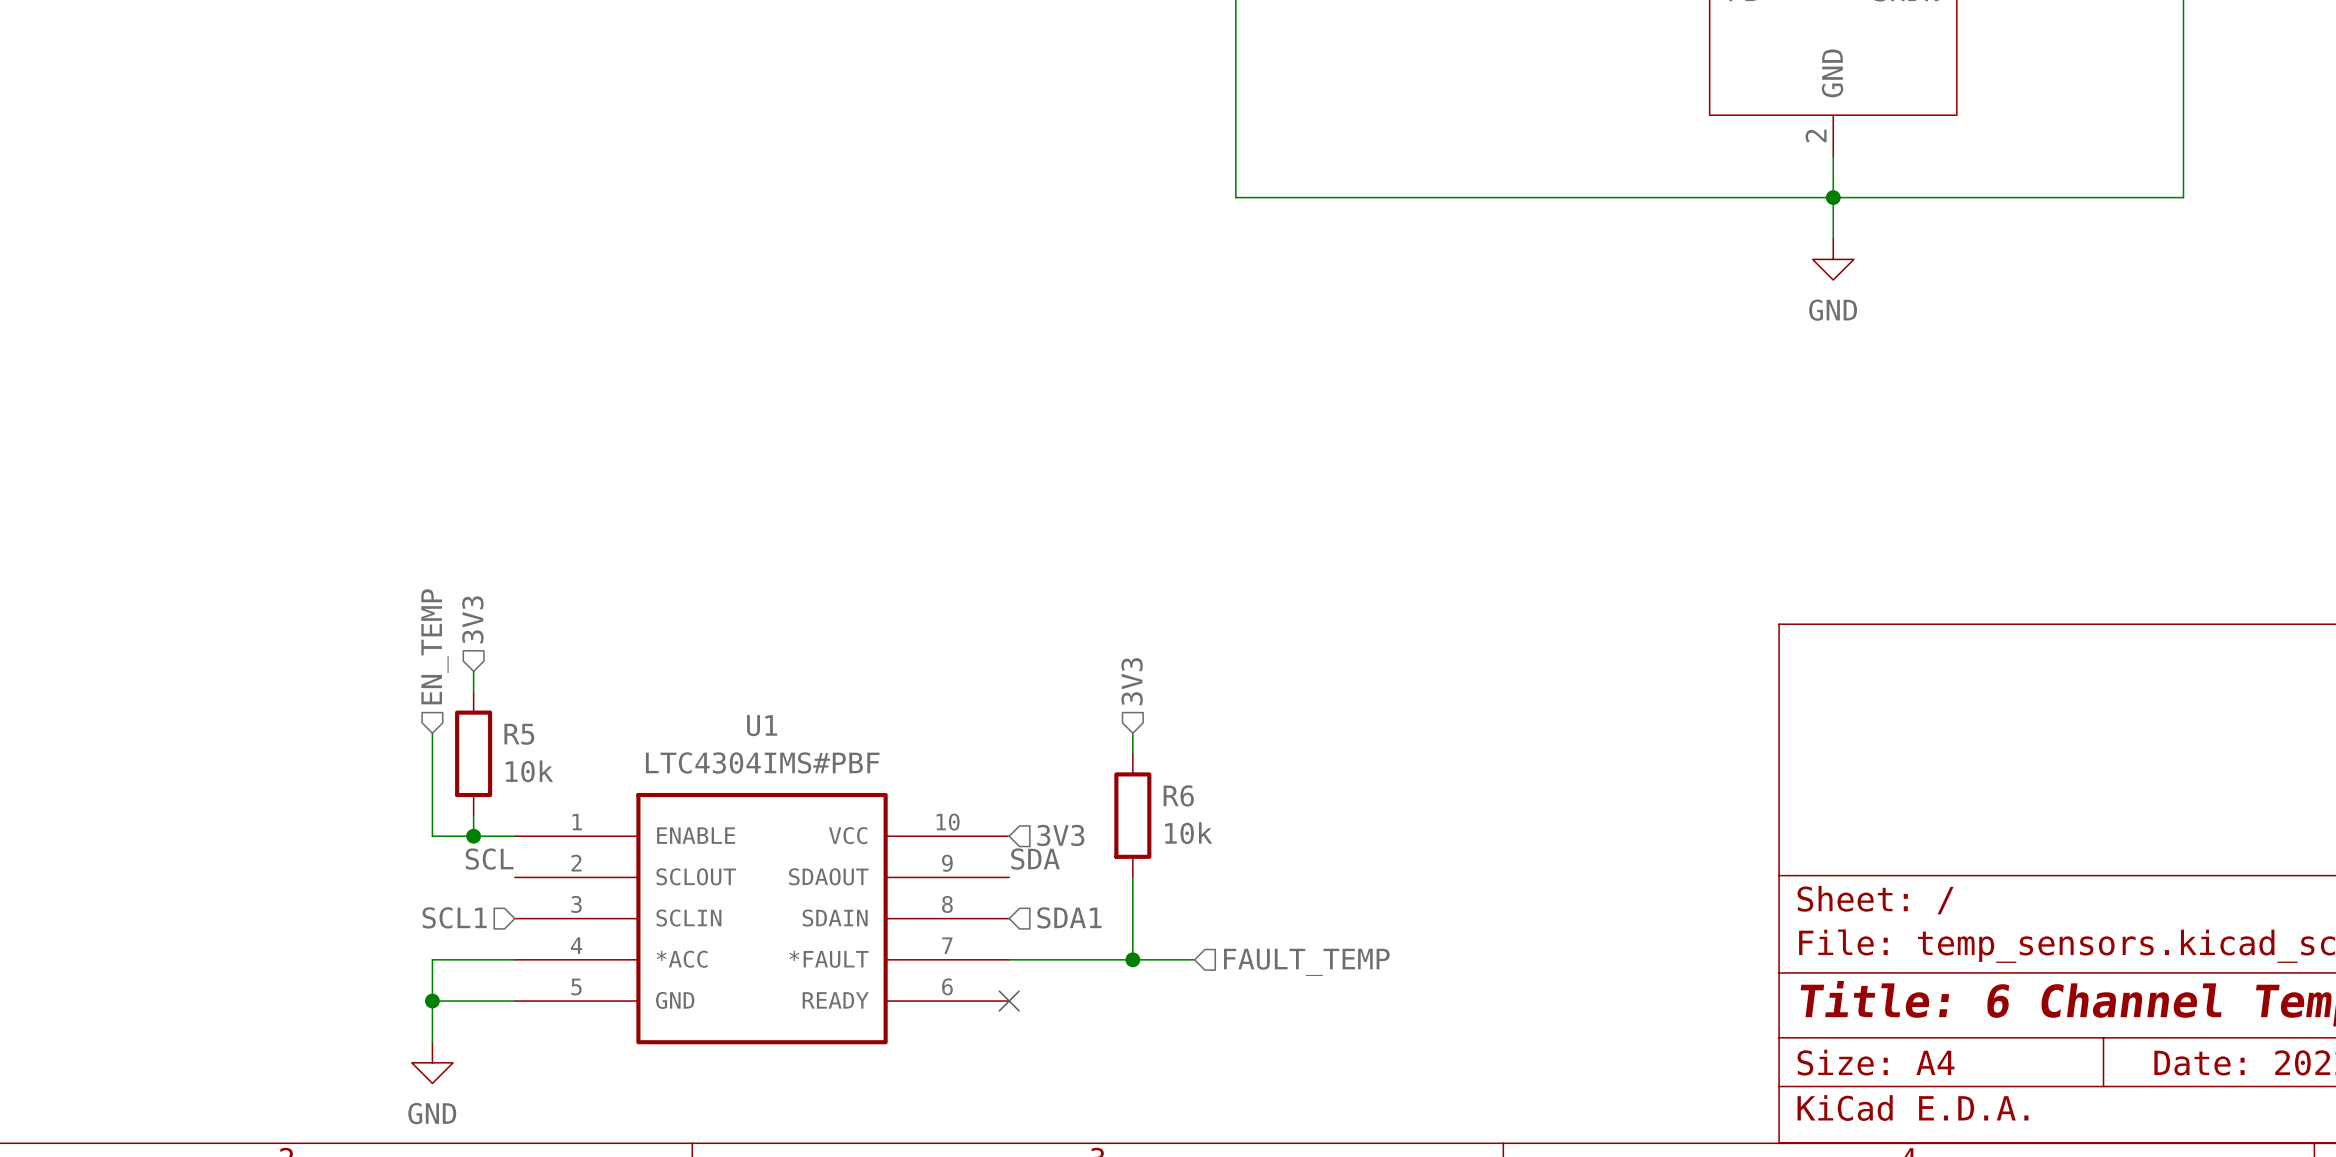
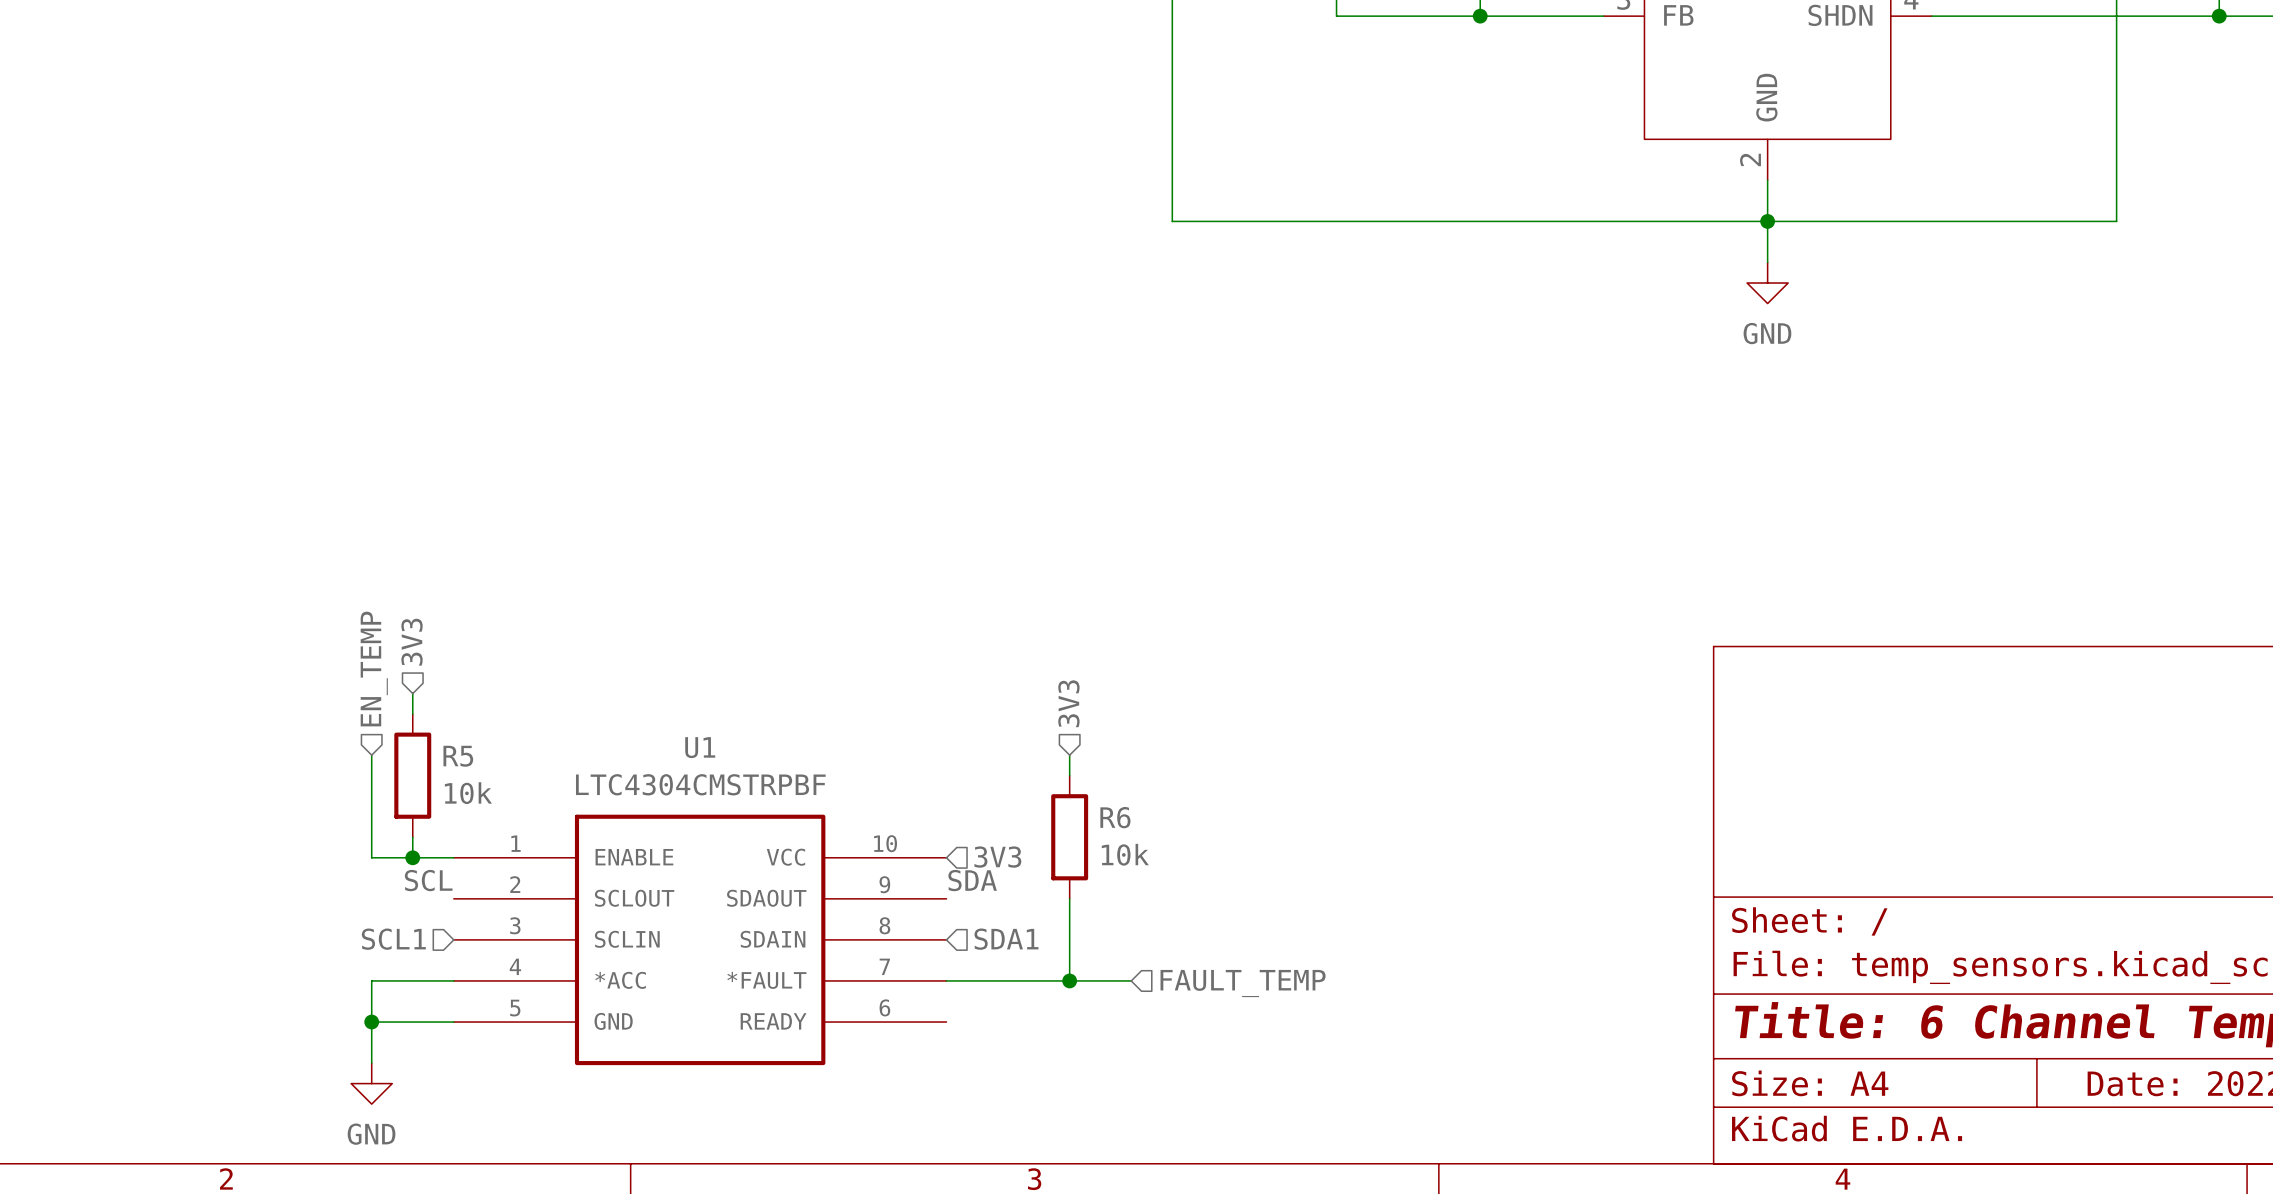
U1 value: LTC4304IMS#PBF (762, 762) -> LTC4304CMSTRPBF (700, 784)
no-connect mark: (1009, 1001) -> none

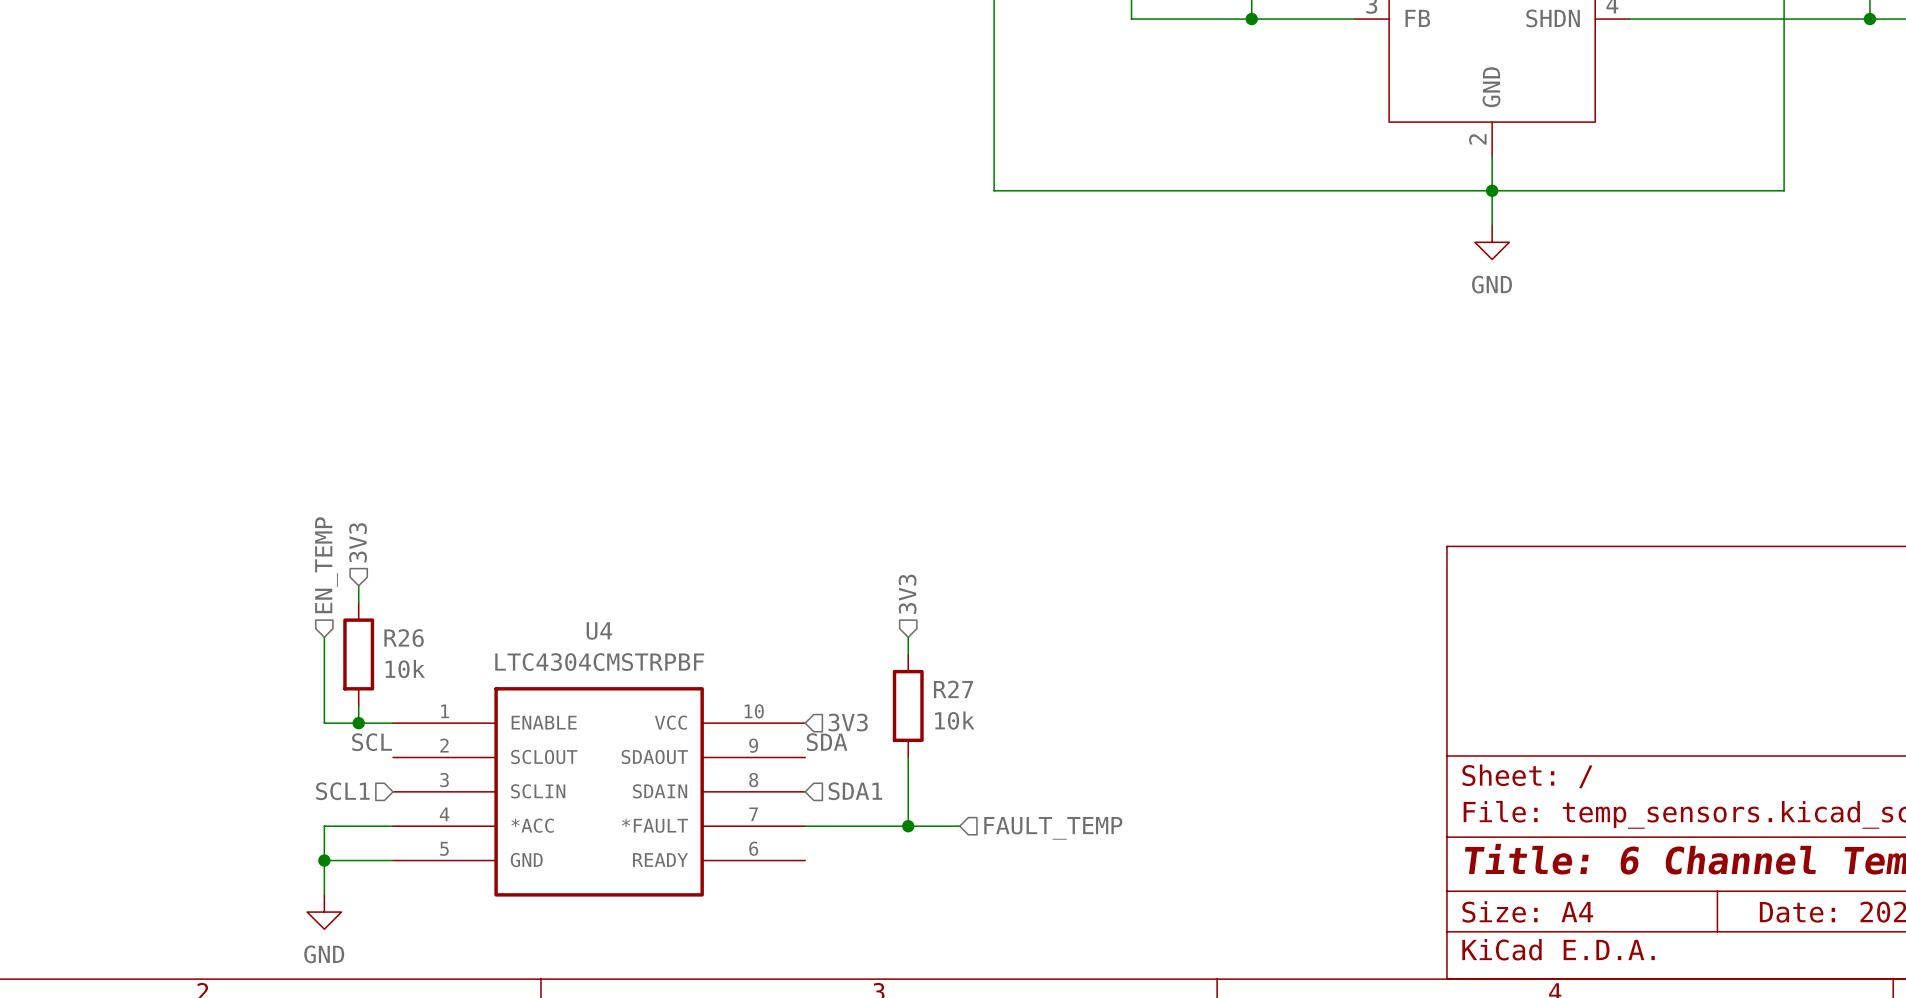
U1 name: U1 (700, 747) -> U4 (599, 630)
R5 name: R5 (458, 756) -> R26 (404, 638)
R6 name: R6 (1115, 817) -> R27 (953, 689)

